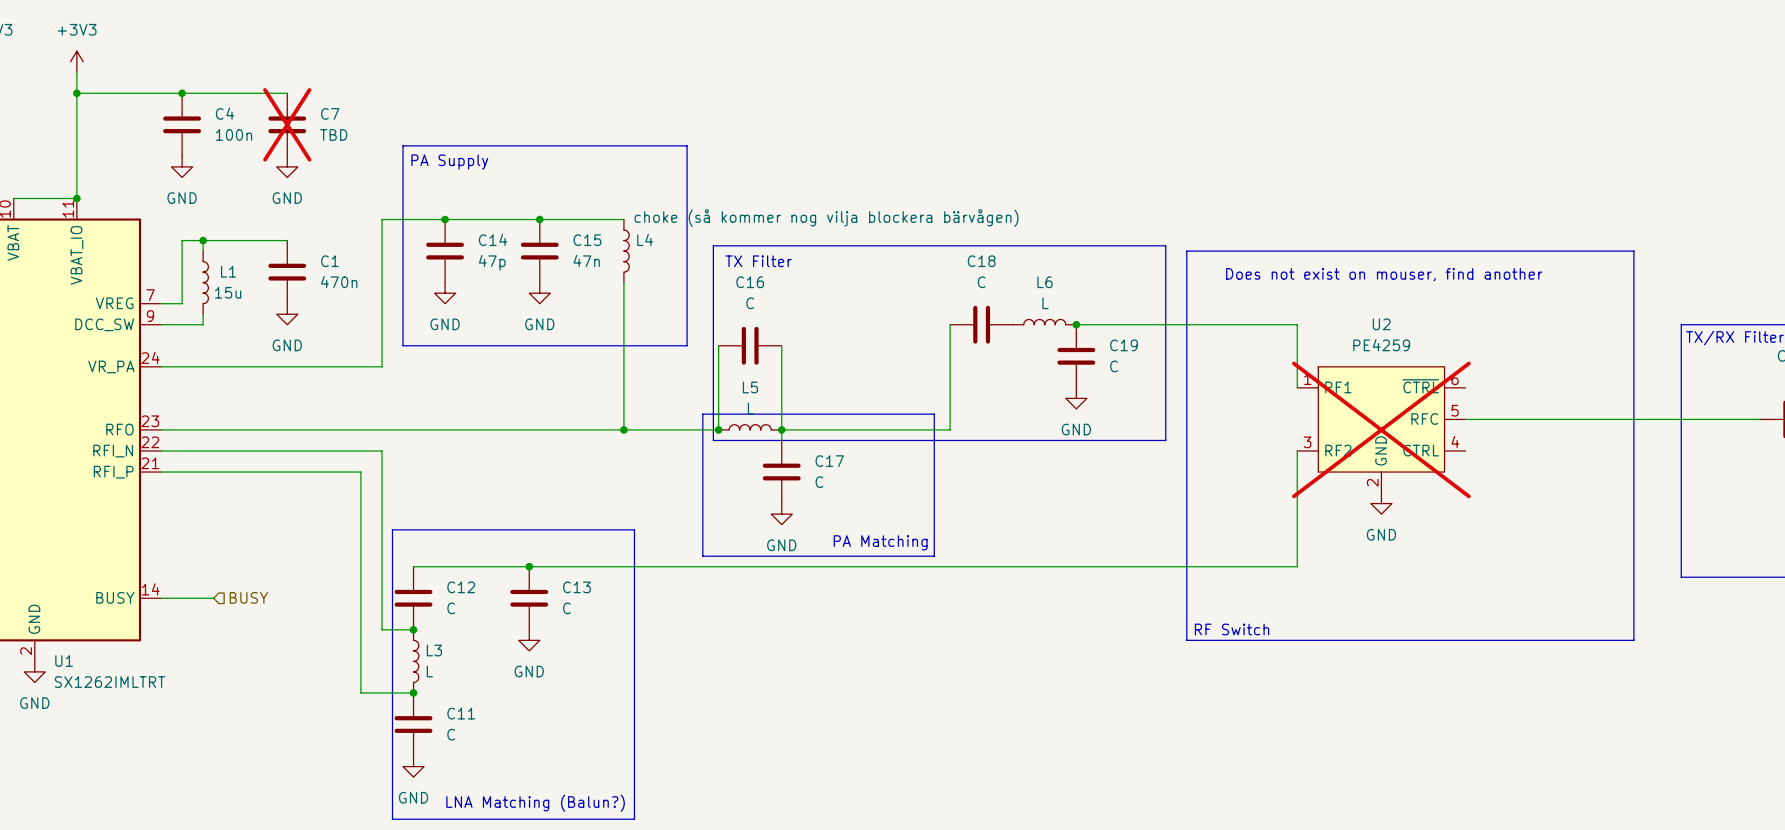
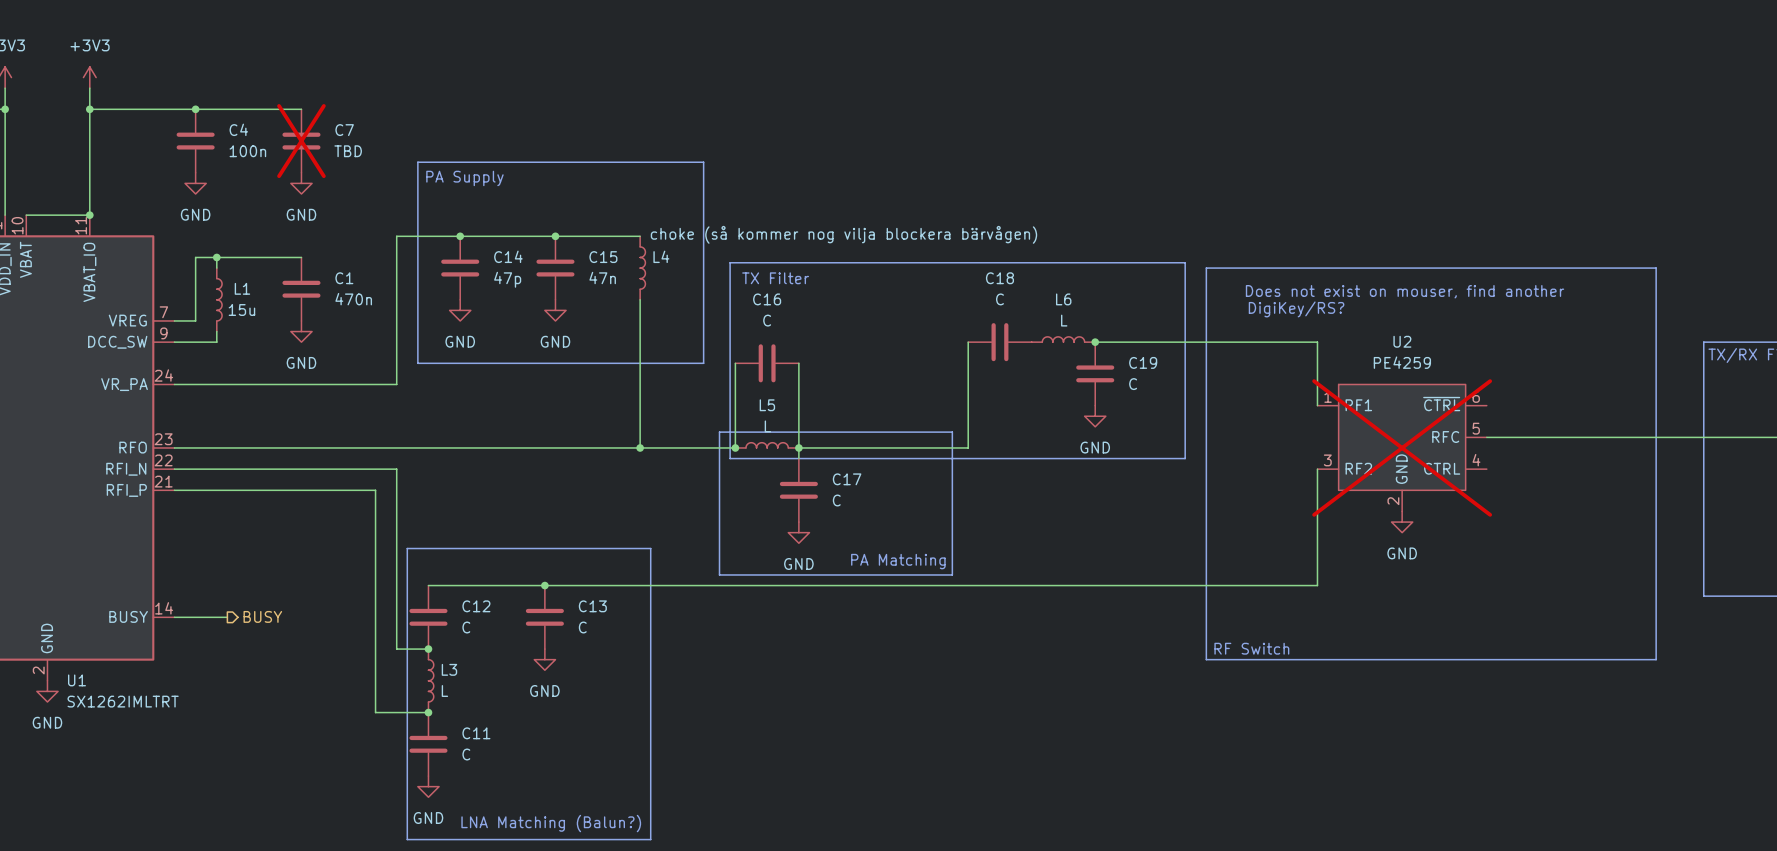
text: none -> DigiKey/RS? (1296, 309)
hierarchical label shape: input (248, 597) -> output (262, 616)

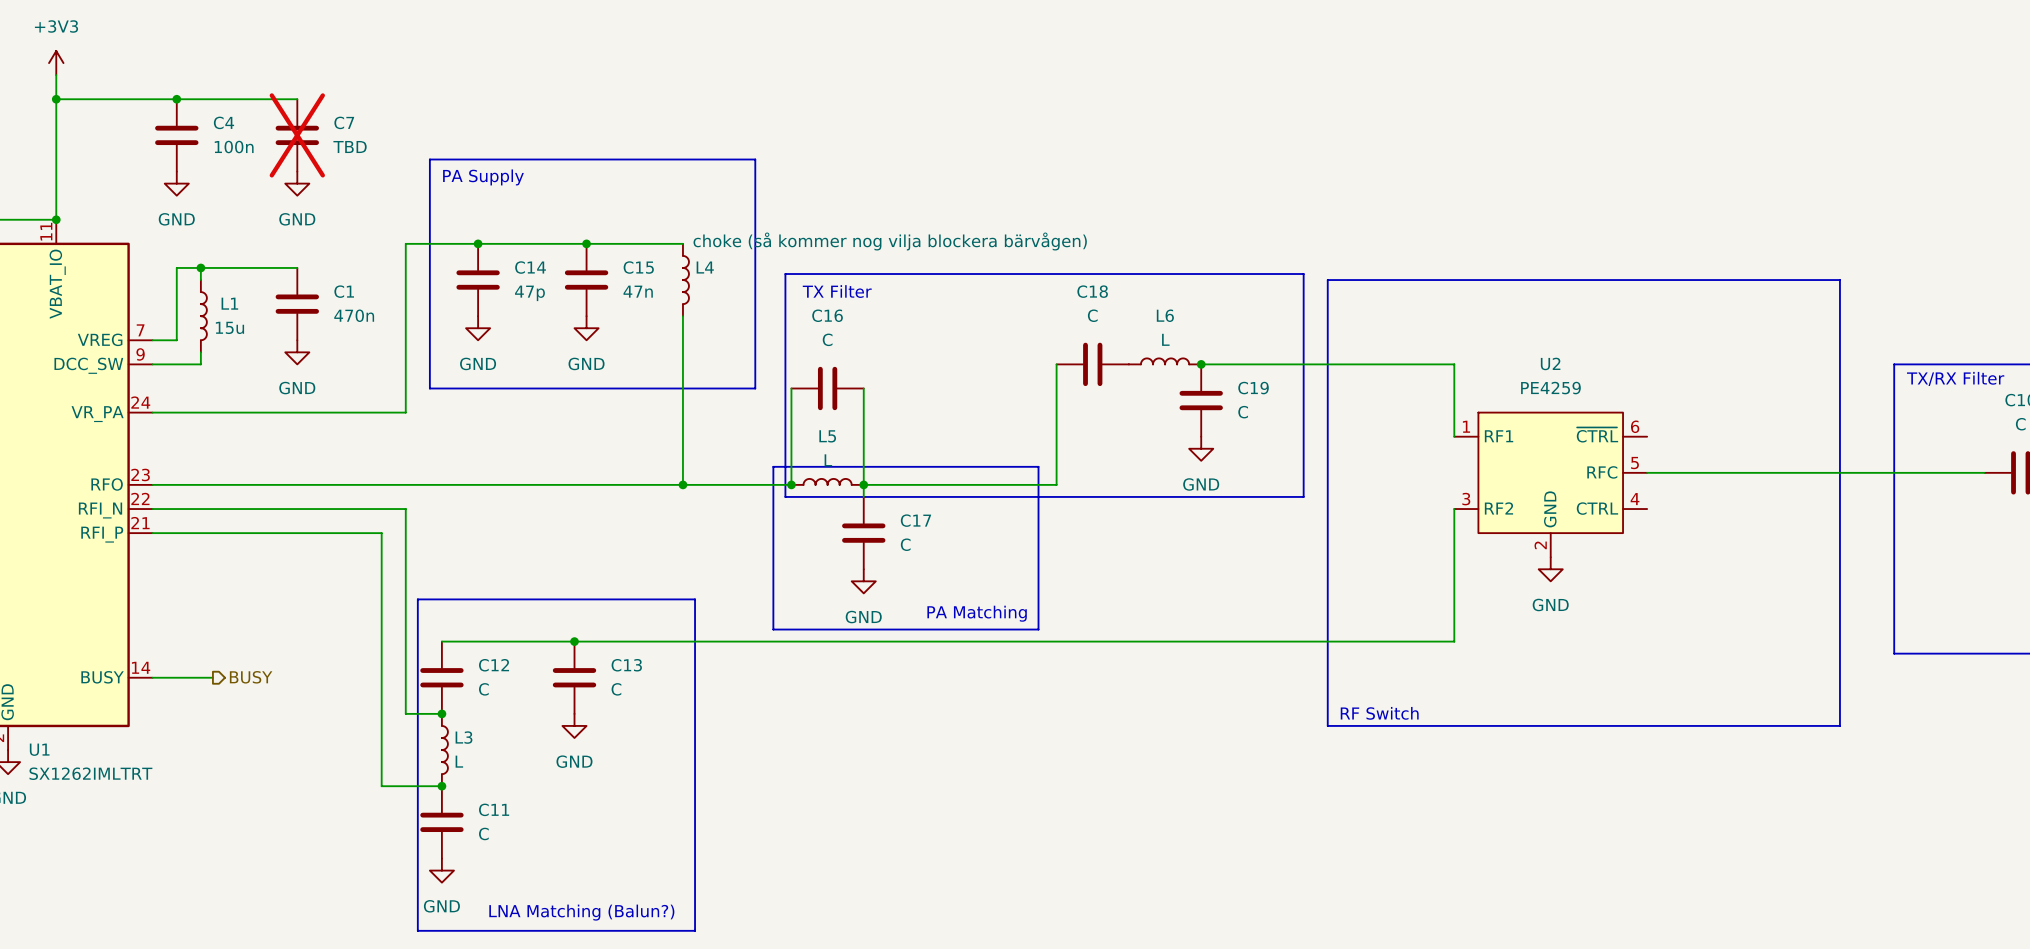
text: Does not exist on mouser, find another (1405, 291) -> none
text: DigiKey/RS? (1296, 309) -> none
U2 do-not-place cross: (1402, 447) -> none

